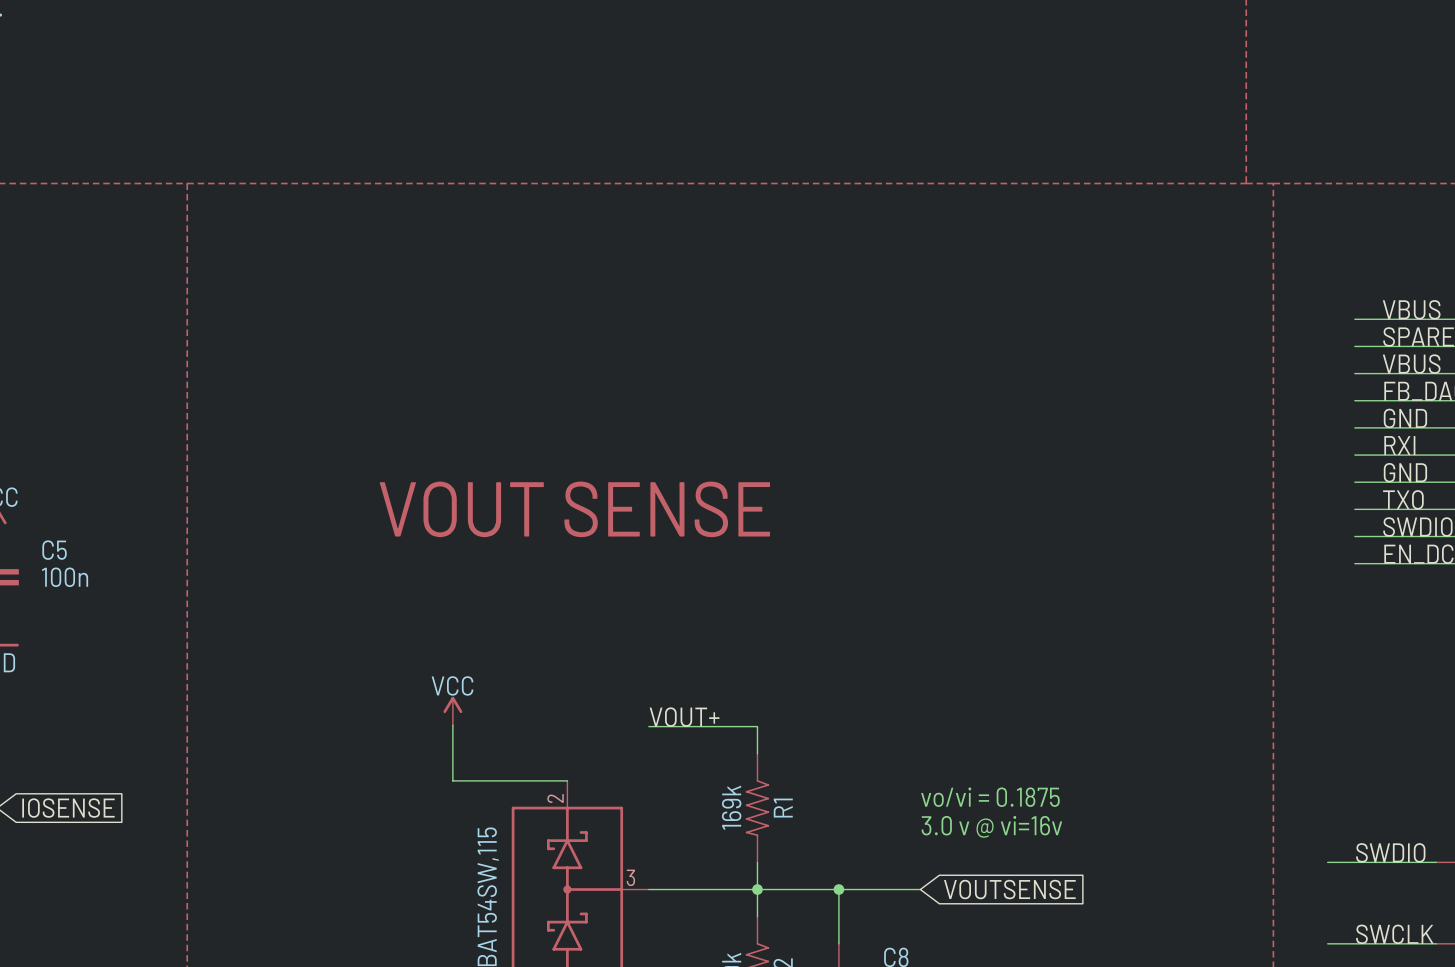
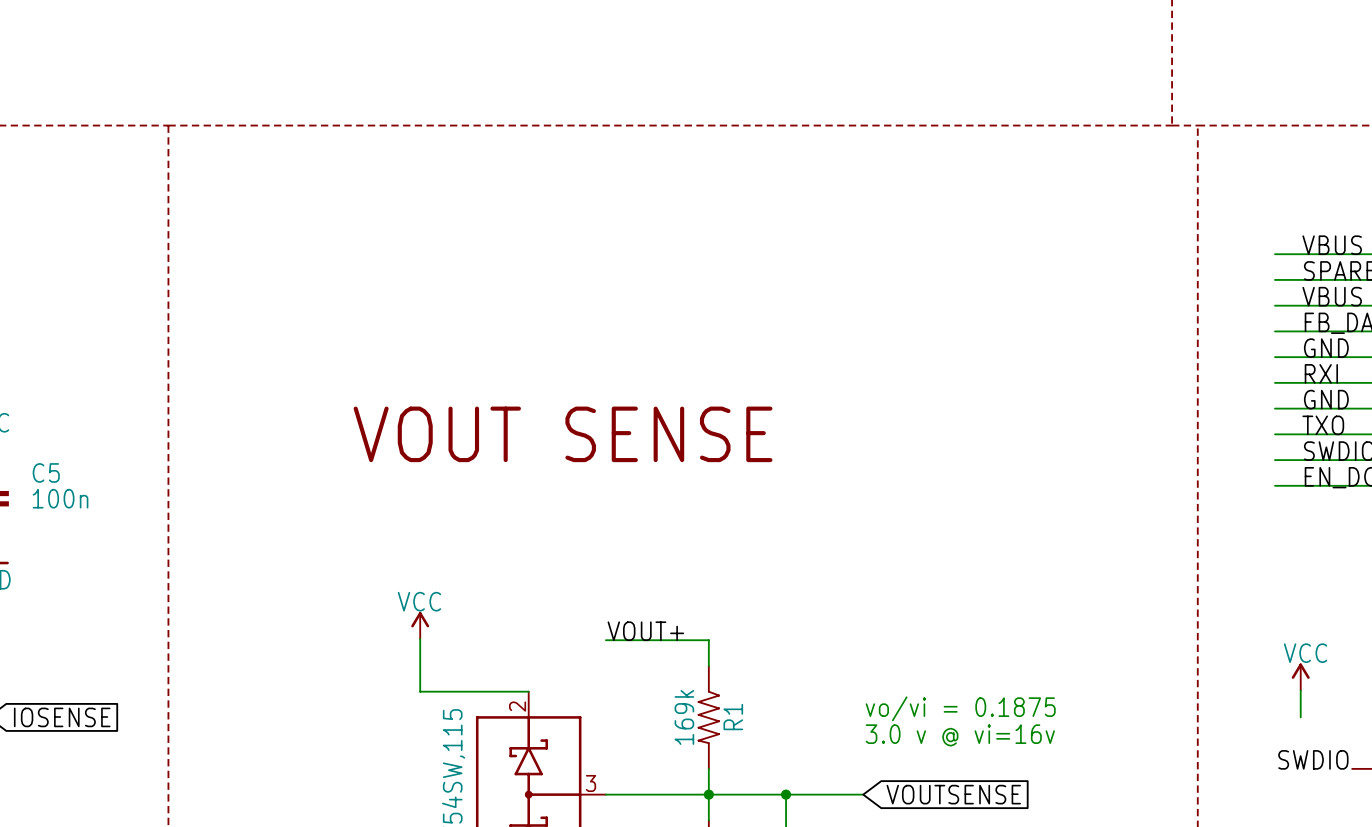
power symbol: none -> VCC (1300, 676)
wire: none -> (1300, 690) (1300, 717)
wire: (1327, 862) (1436, 862) -> none

